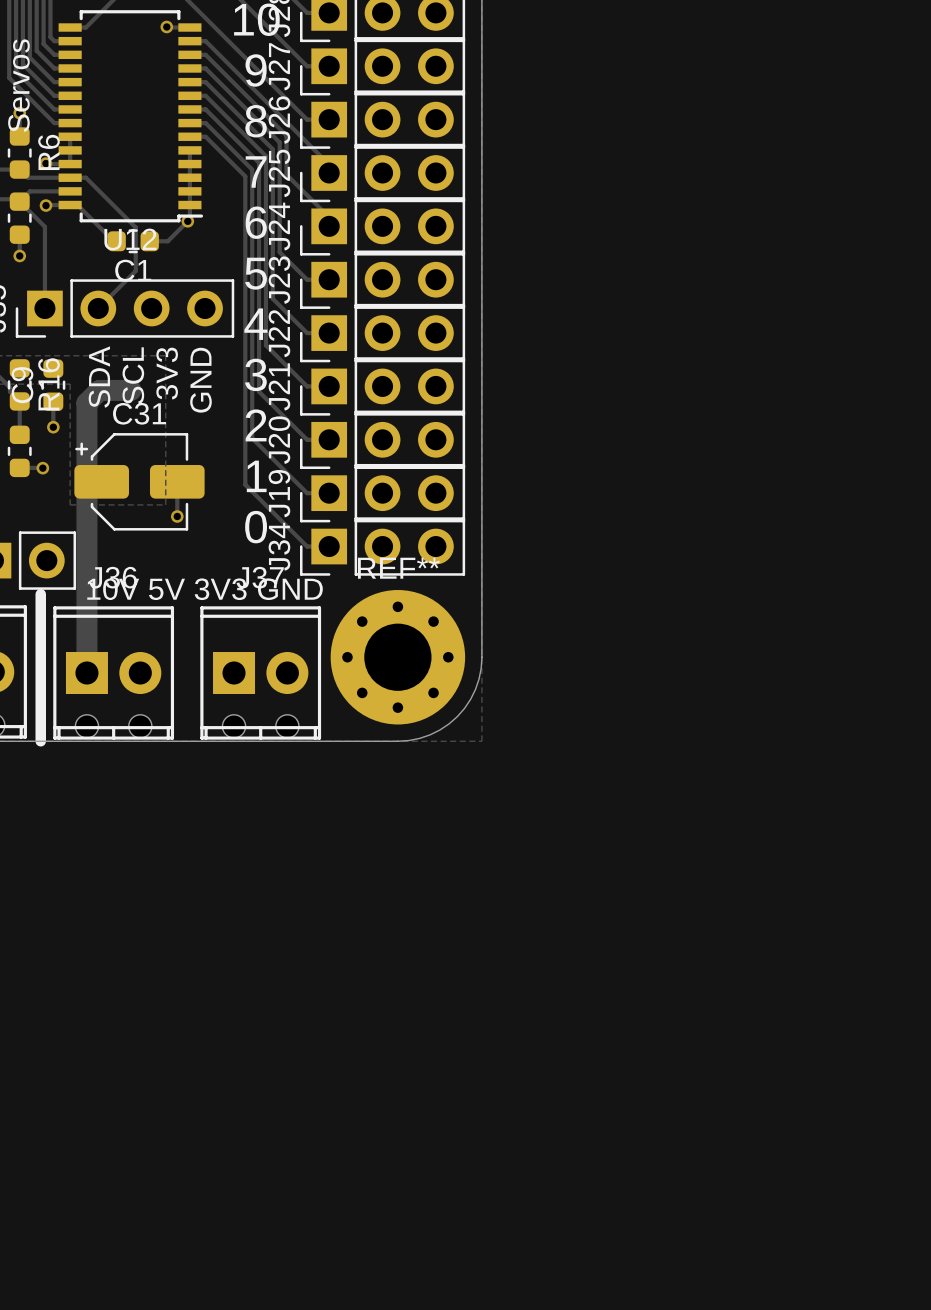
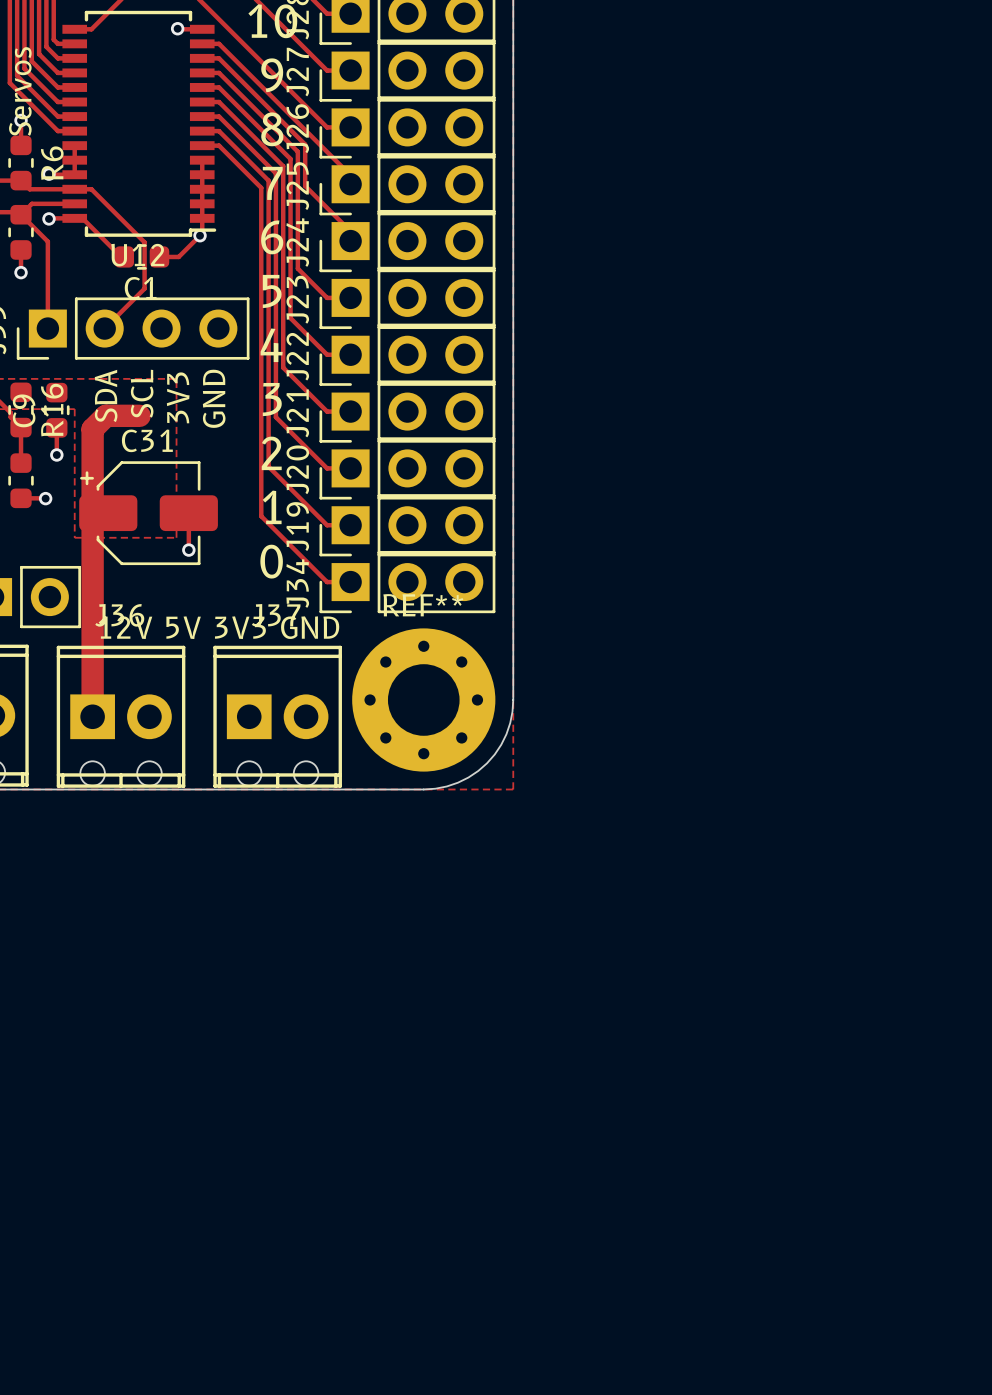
text: 10V 5V 3V3 GND (205, 589) -> 12V 5V 3V3 GND (218, 627)
line: (40, 594) (40, 741) -> none

